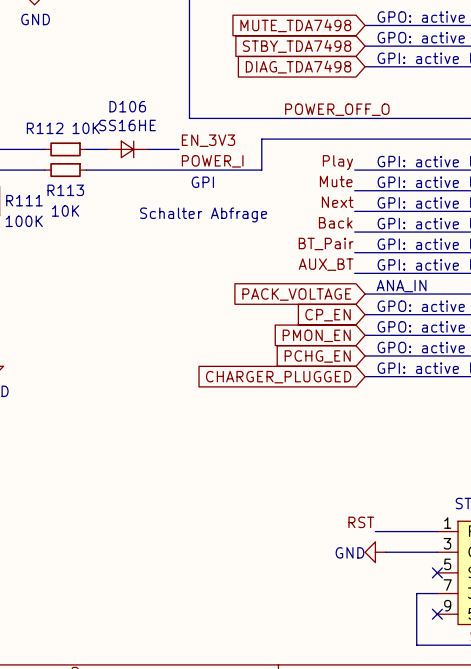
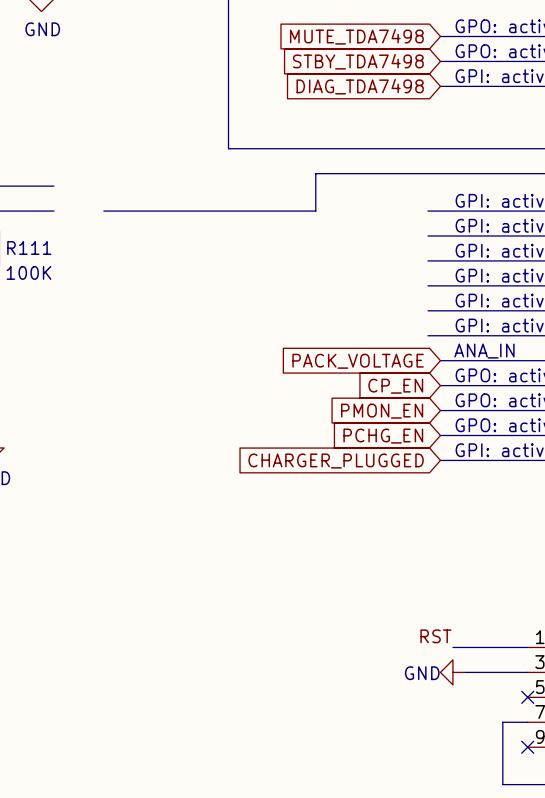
label: POWER_OFF_O (337, 109) -> none
label: EN_3V3 (208, 140) -> none
R112: 10K (65, 149) -> none
wire: (86, 149) (106, 149) -> none
D106: SS16HE (127, 149) -> none
wire: (148, 149) (179, 149) -> none
label: POWER_I (212, 161) -> none
label: Play (337, 162) -> none
R113: 10K (65, 170) -> none
label: Mute (336, 181) -> none
text: GPI (202, 182) -> none
label: Next (337, 202) -> none
text: Schalter Abfrage (203, 214) -> none
label: Back (335, 222) -> none
label: BT_Pair (326, 243) -> none
label: AUX_BT (326, 264) -> none

